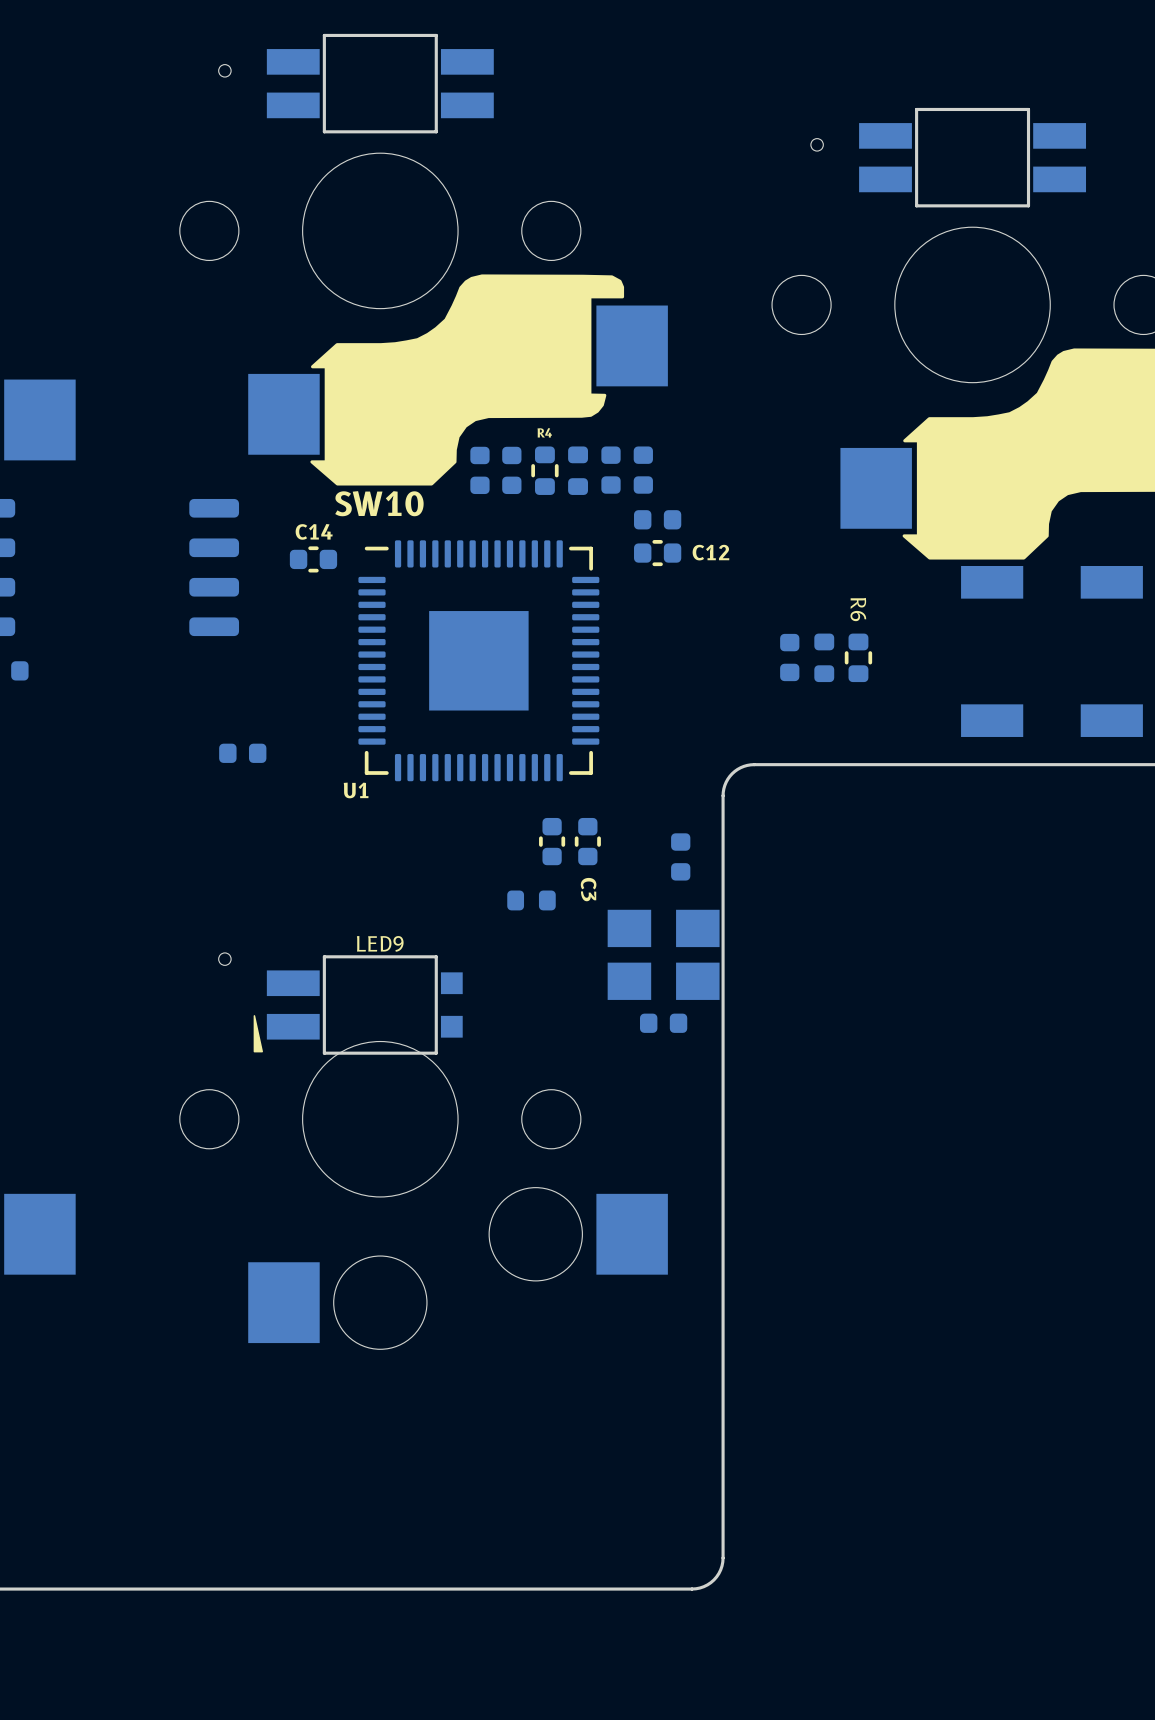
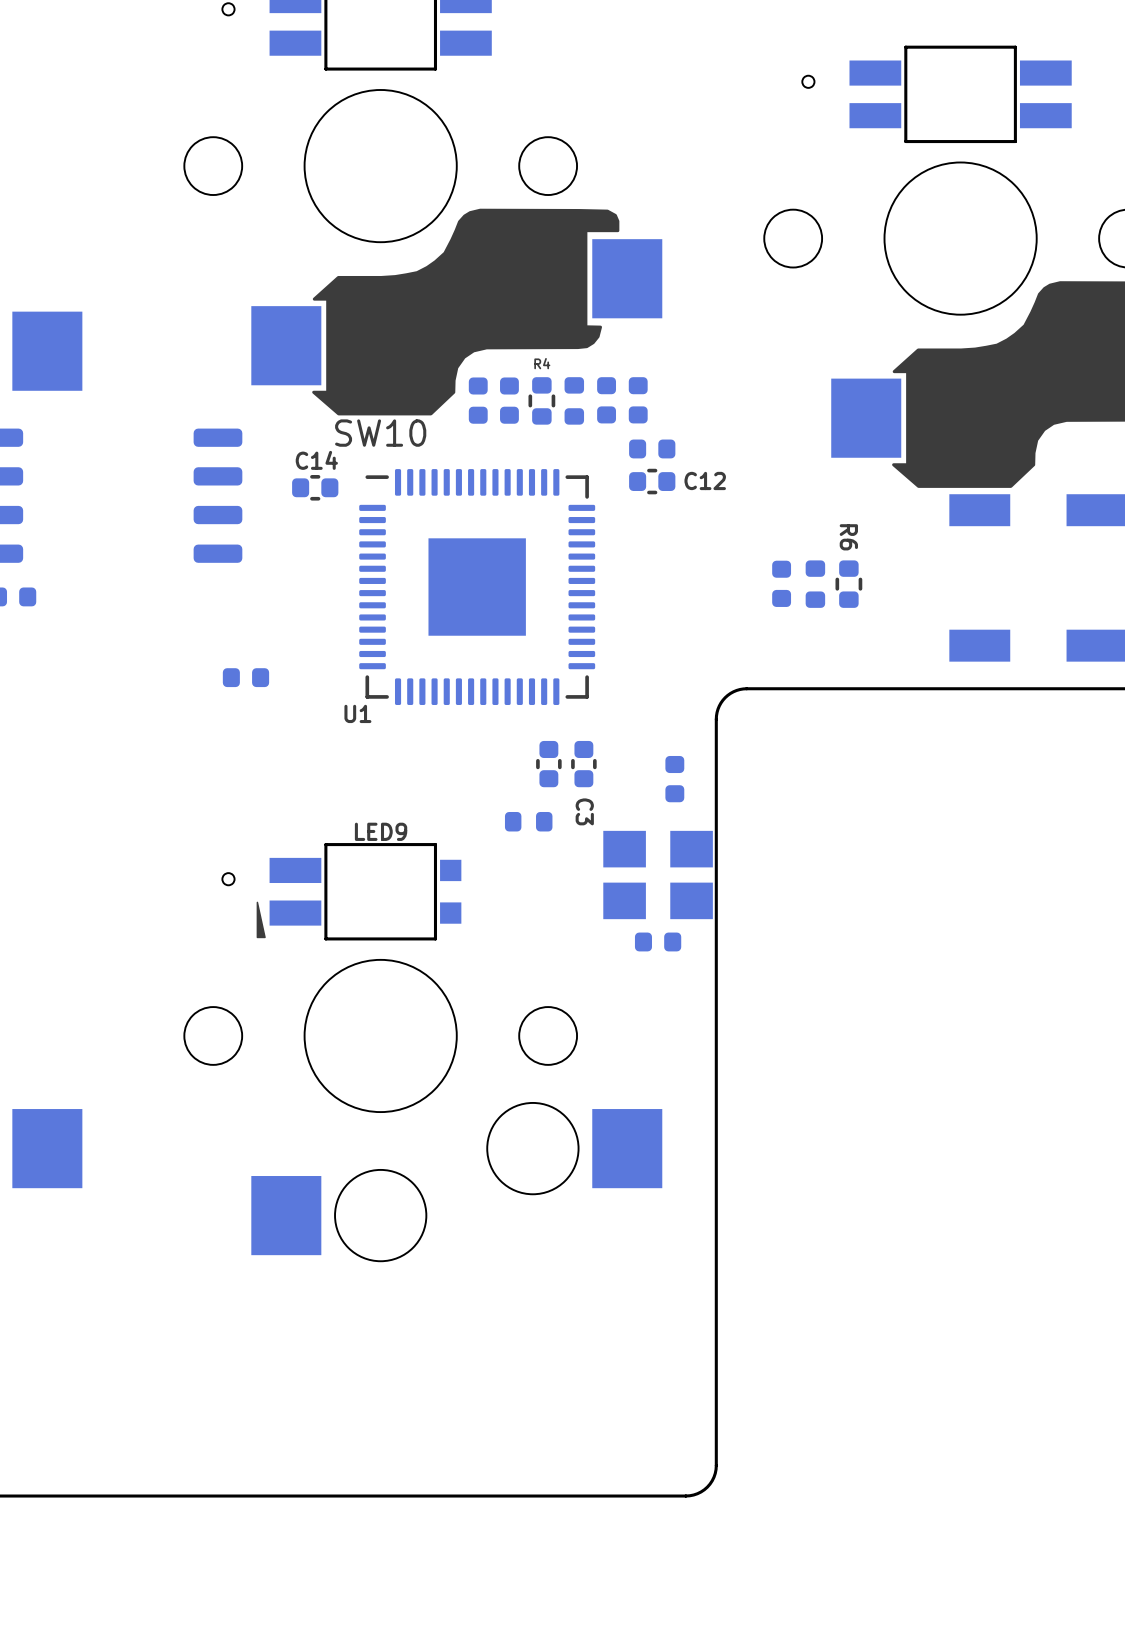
LED9 position: (358, 1004) -> (358, 891)

